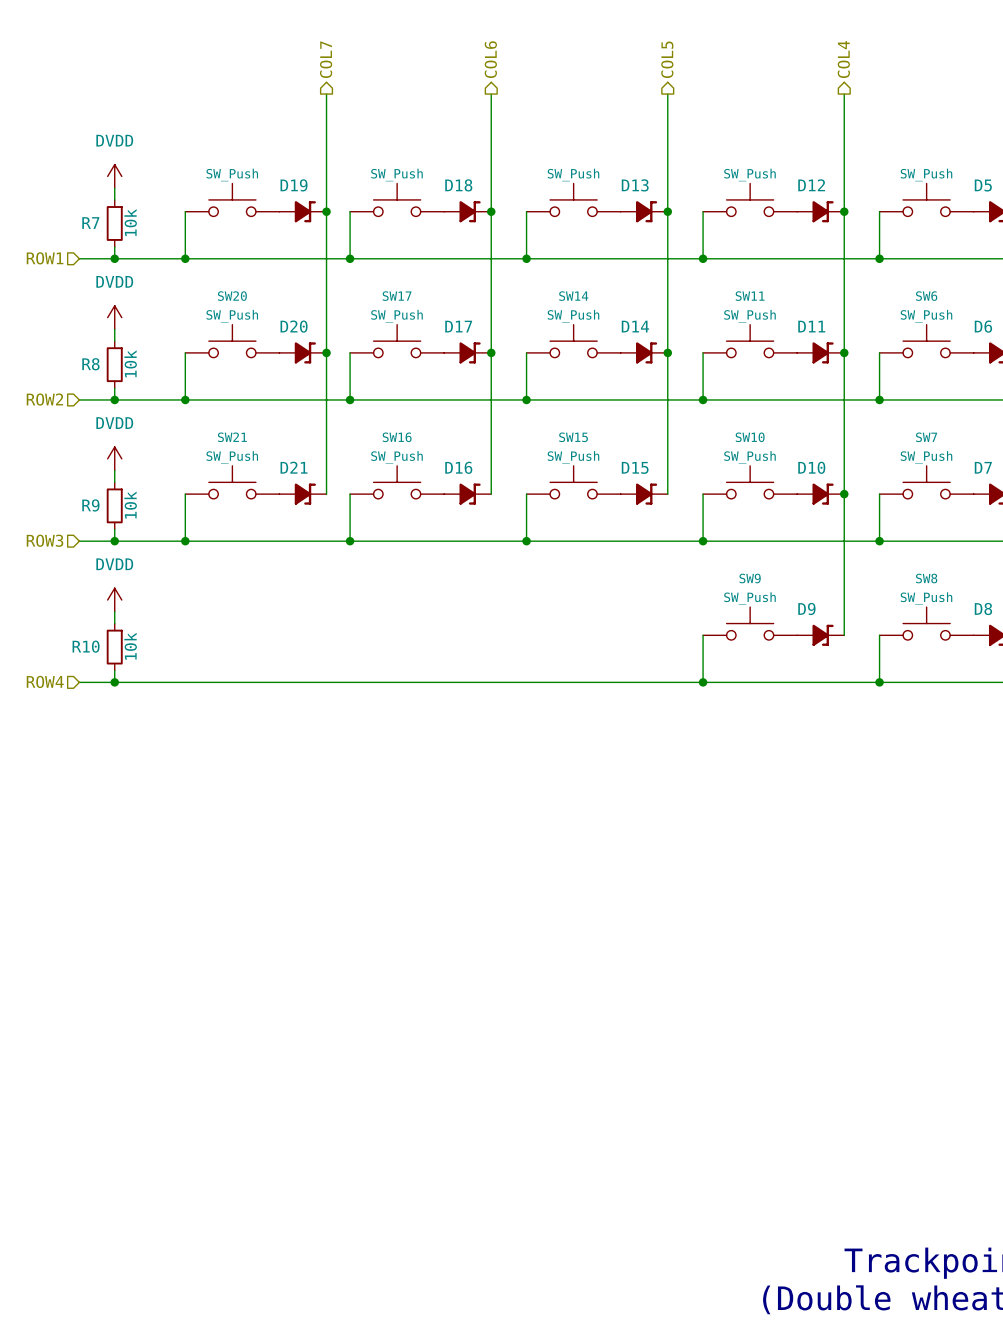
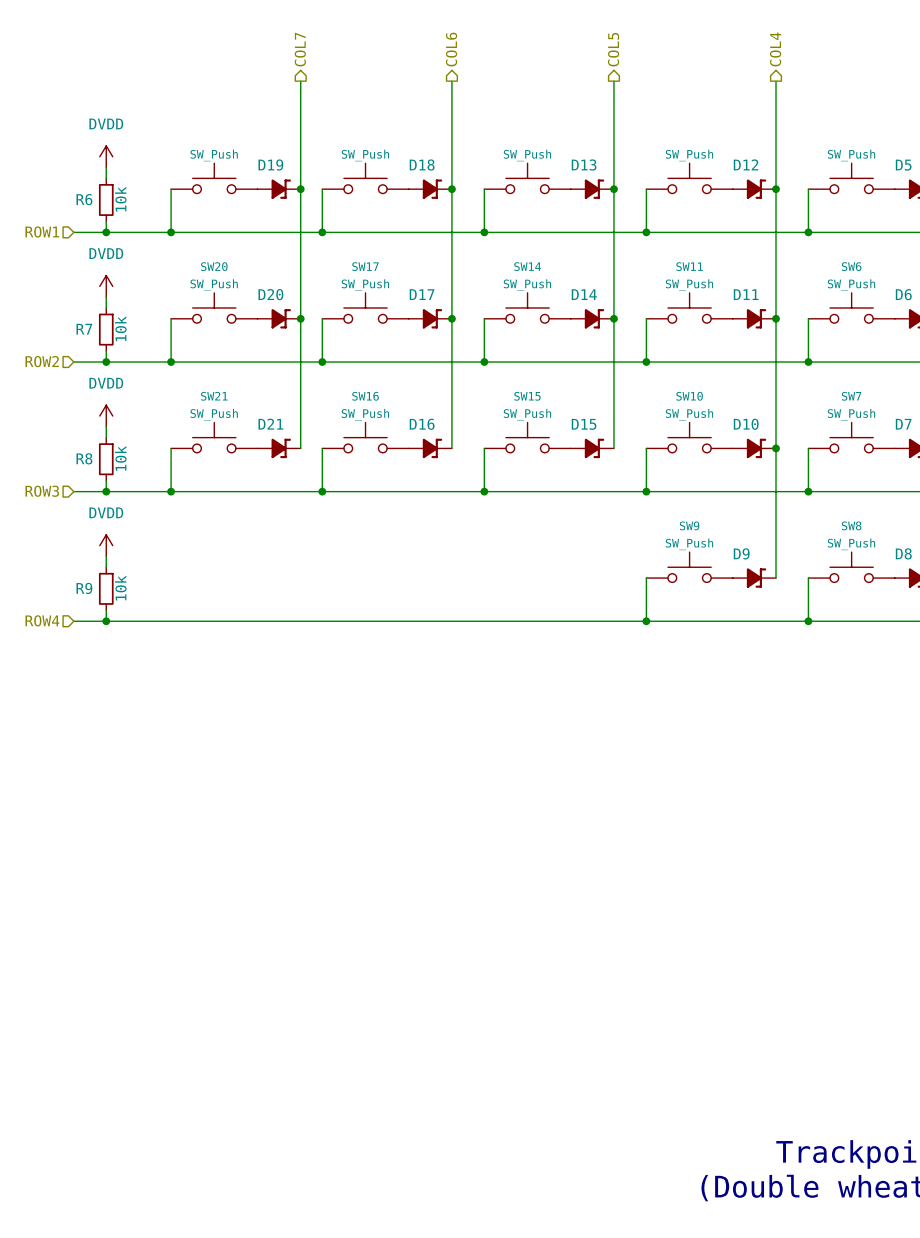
R7 name: R7 (90, 223) -> R6 (84, 199)
R8 name: R8 (90, 364) -> R7 (84, 329)
R9 name: R9 (90, 505) -> R8 (84, 458)
R10 name: R10 (86, 646) -> R9 (84, 588)

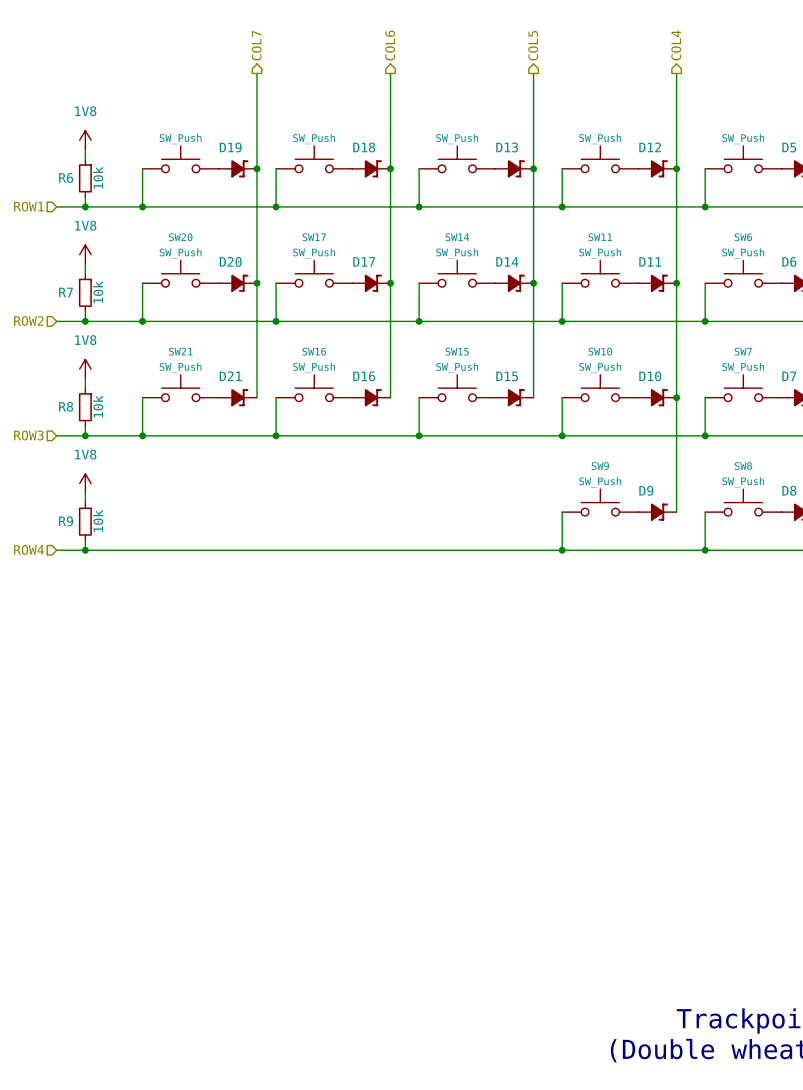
power symbol: DVDD (106, 156) -> 1V8 (85, 140)
power symbol: DVDD (106, 286) -> 1V8 (85, 254)
power symbol: DVDD (106, 416) -> 1V8 (85, 369)
power symbol: DVDD (106, 545) -> 1V8 (85, 483)

